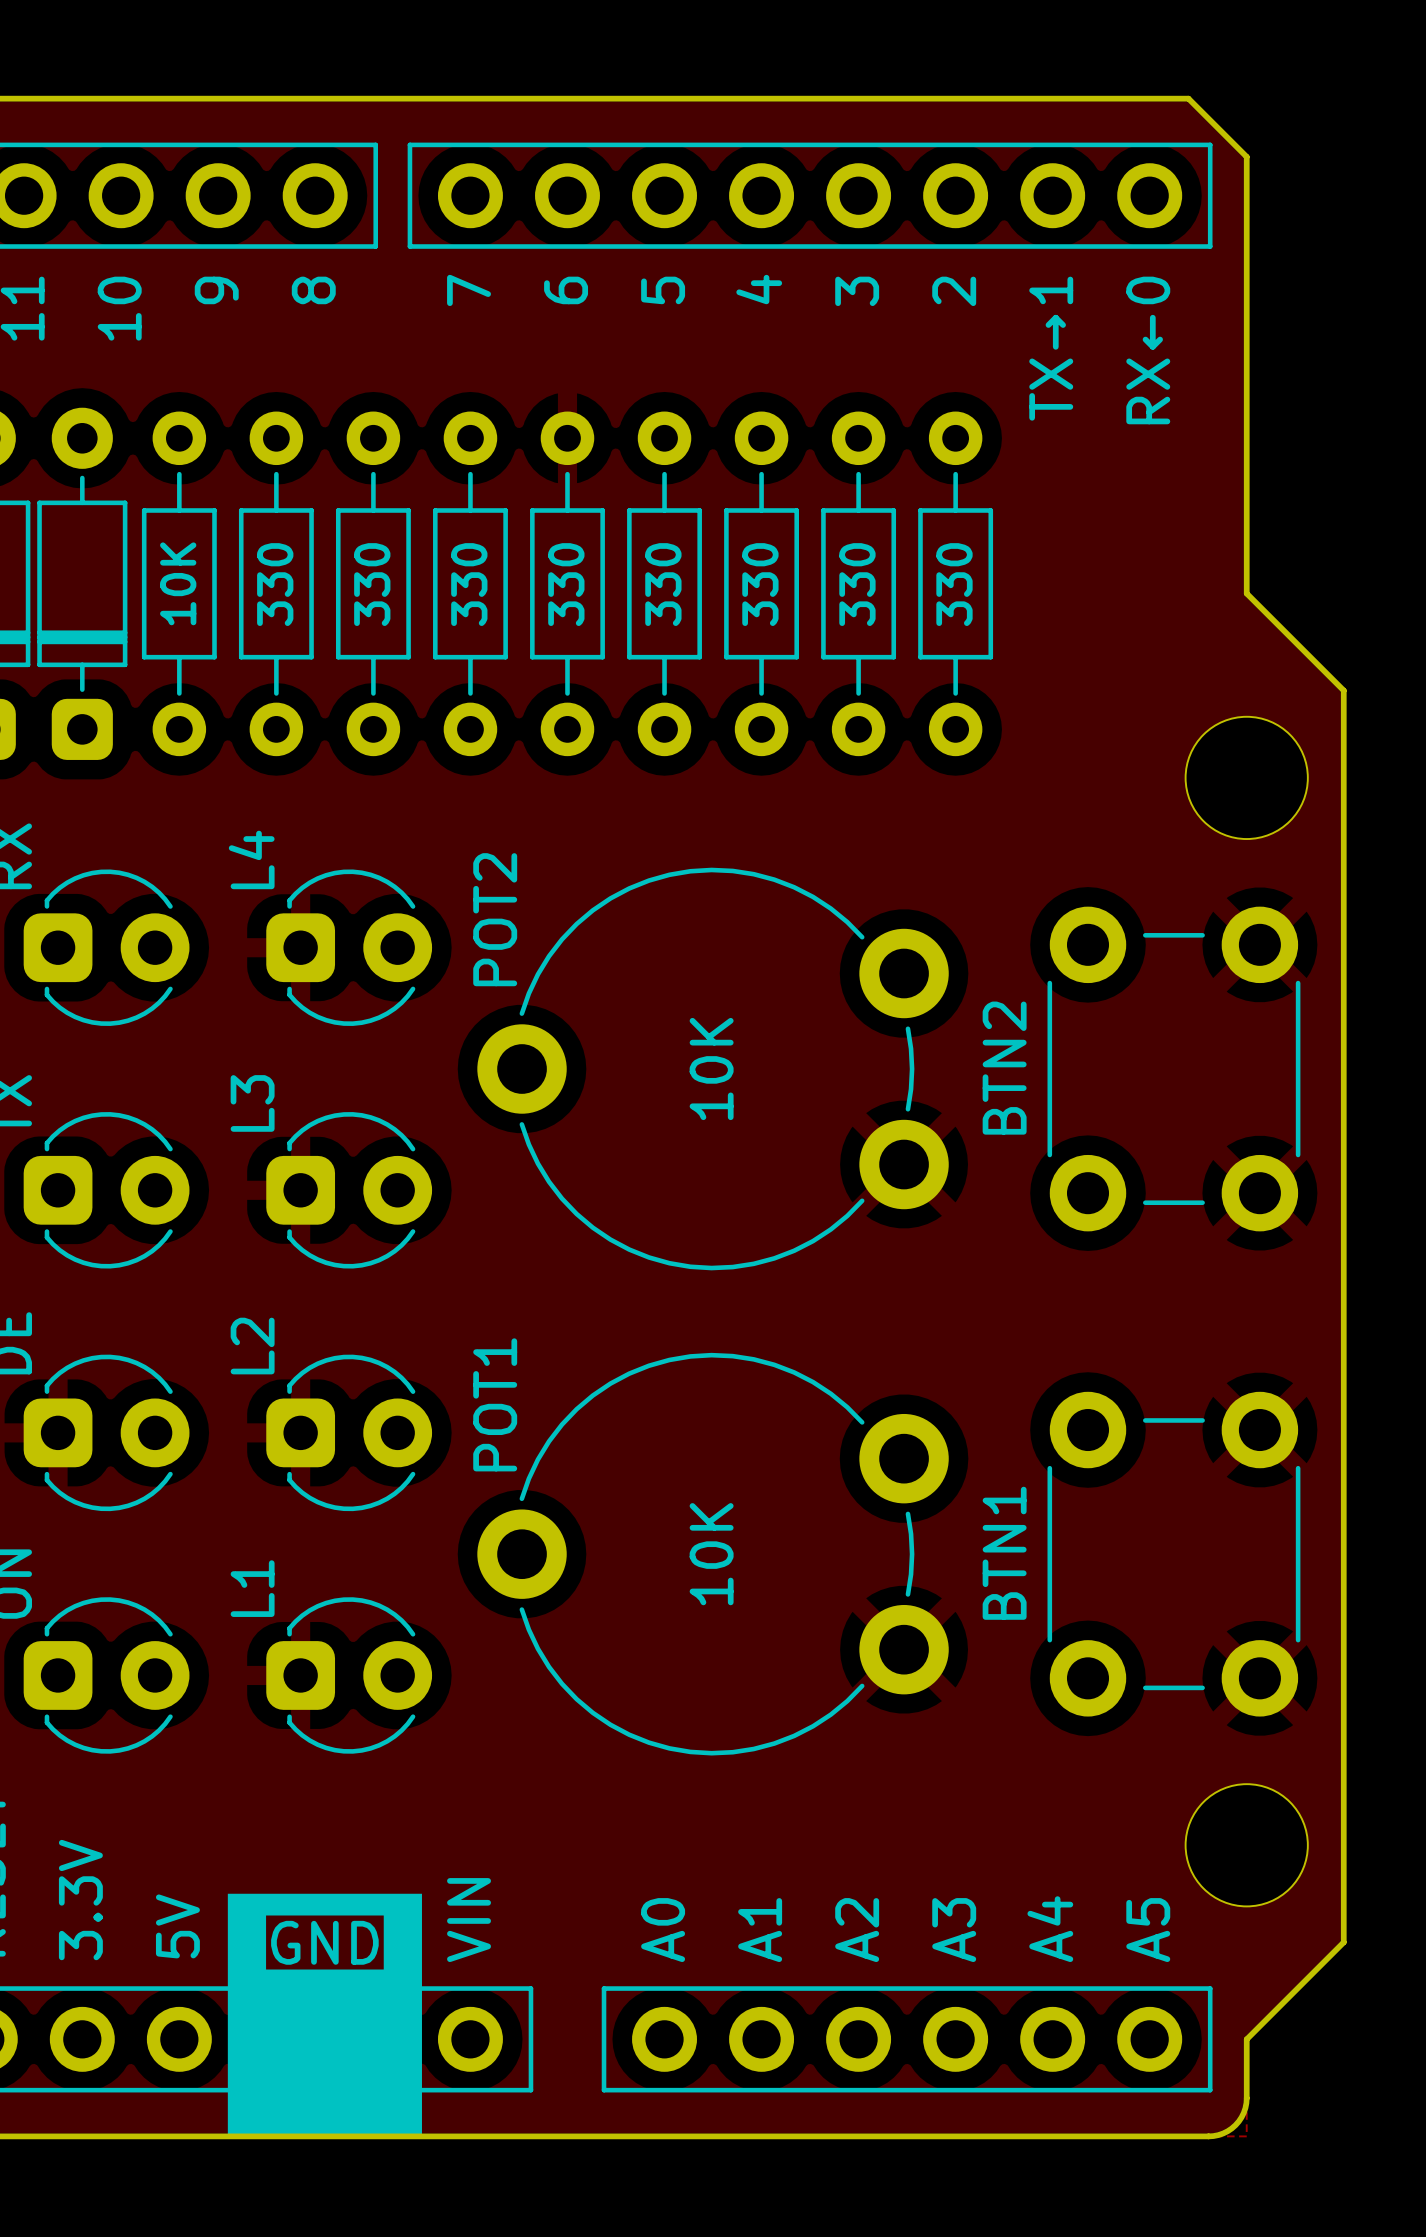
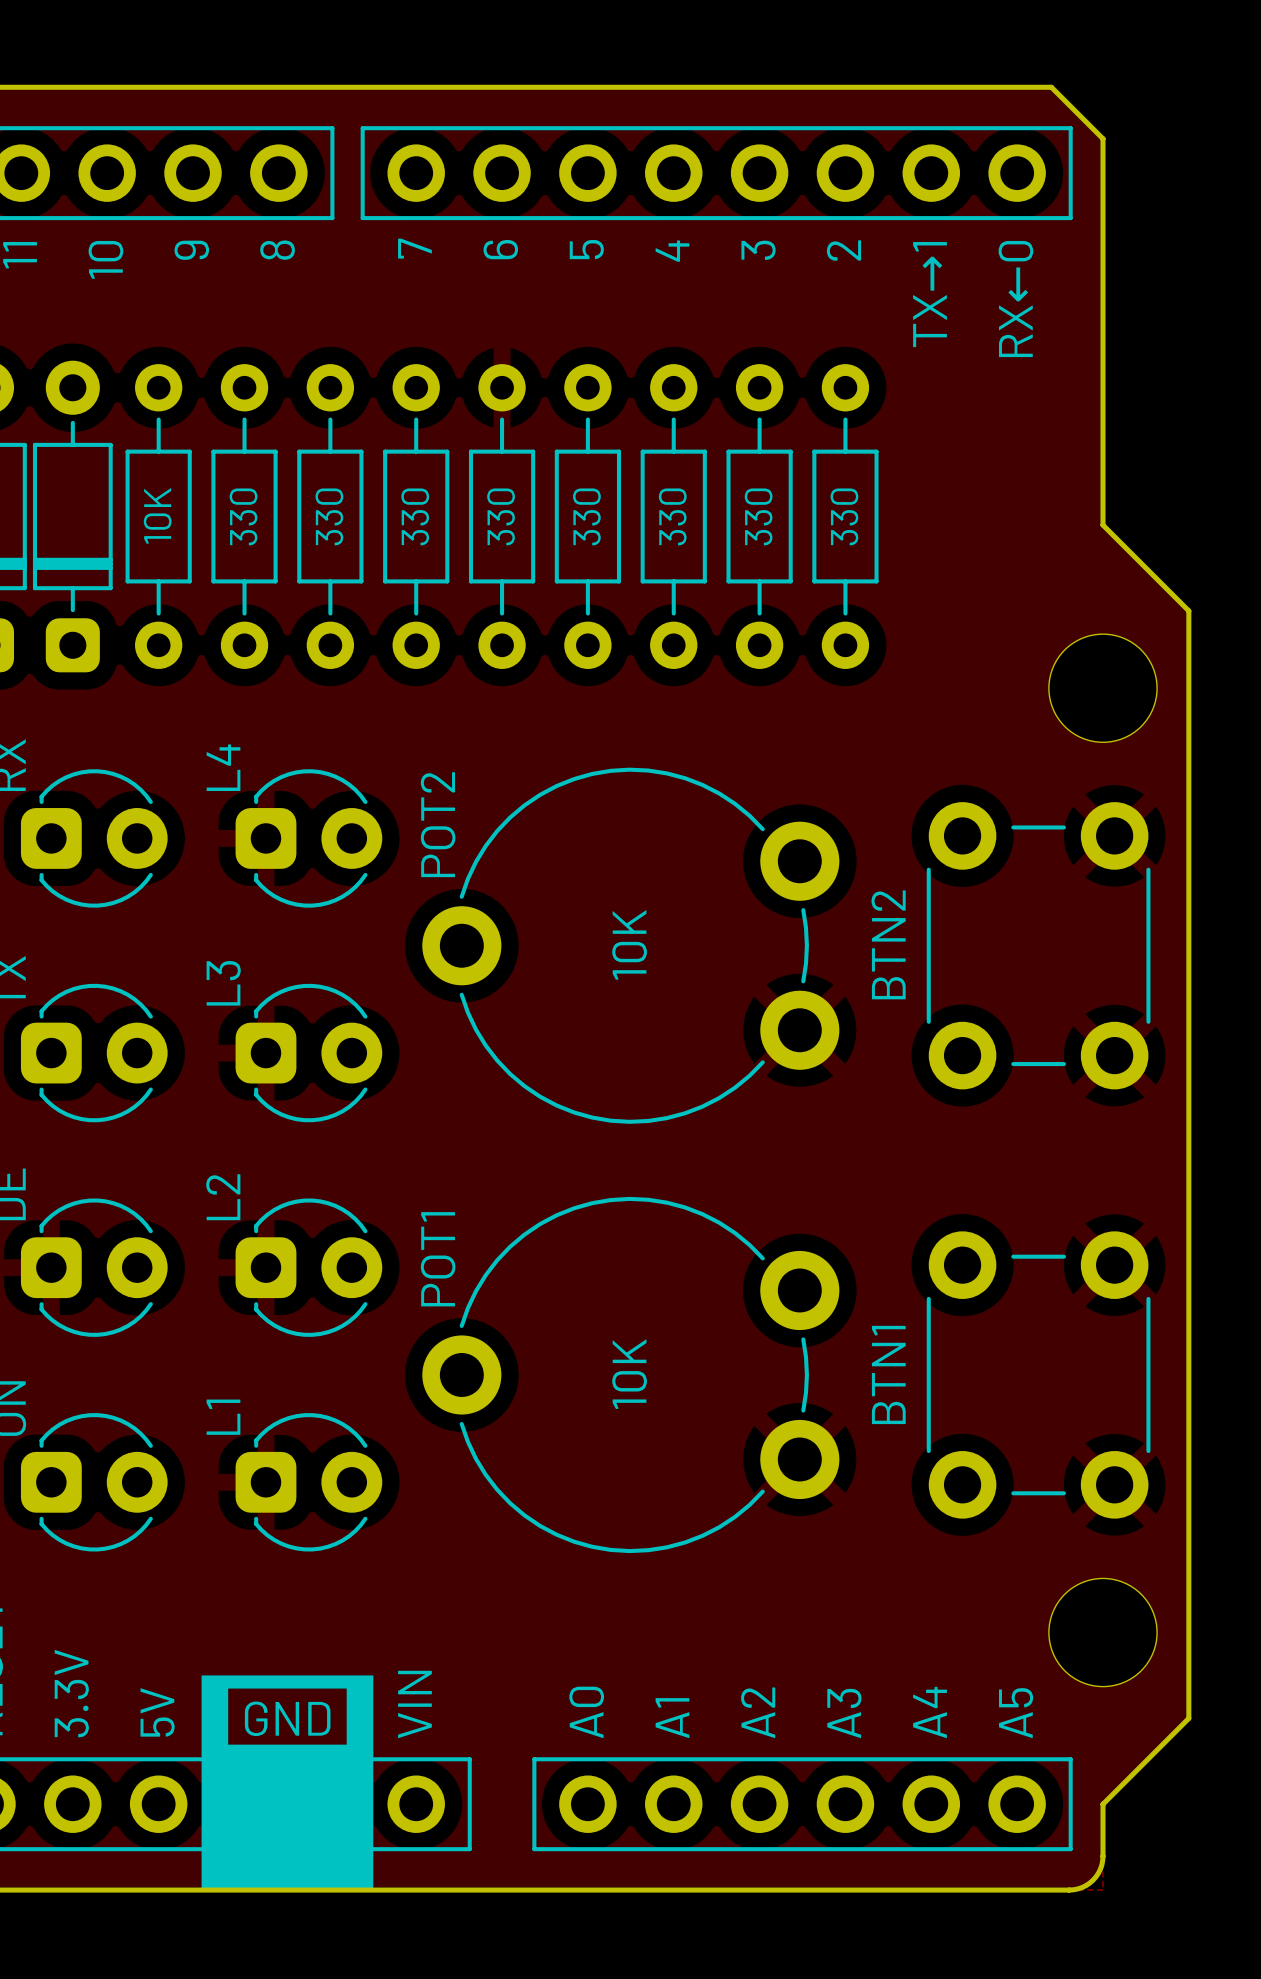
drawing shape: [227, 1893, 422, 2137] -> [201, 1675, 374, 1891]

